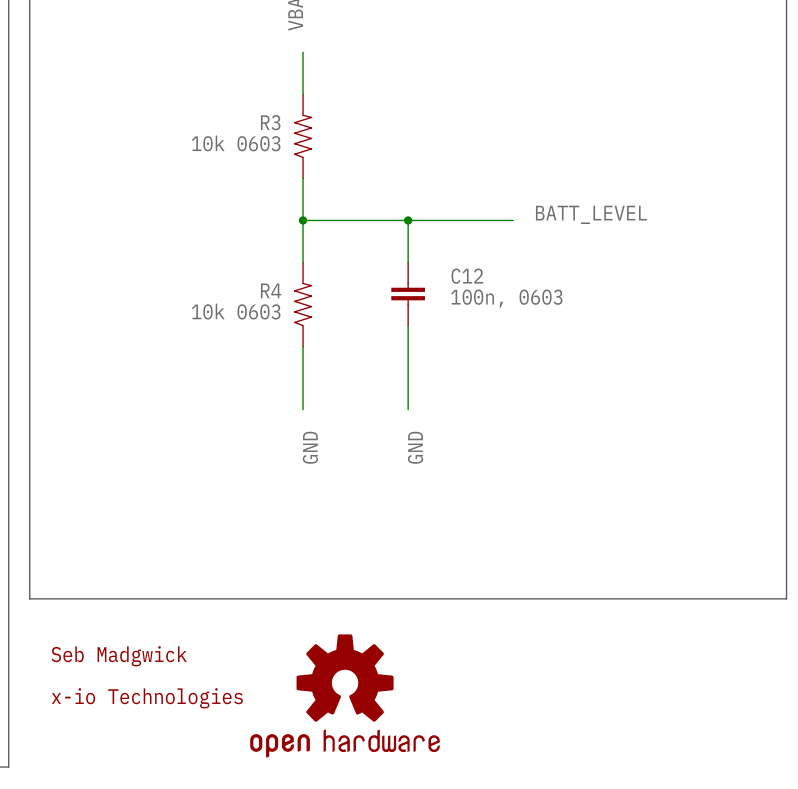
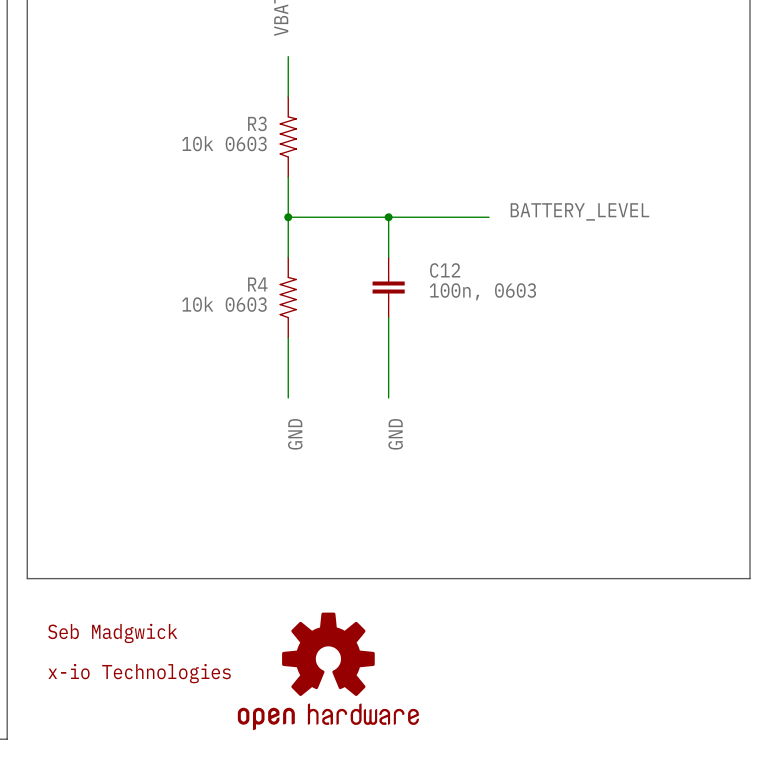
label: BATT_LEVEL (591, 214) -> BATTERY_LEVEL (579, 211)

